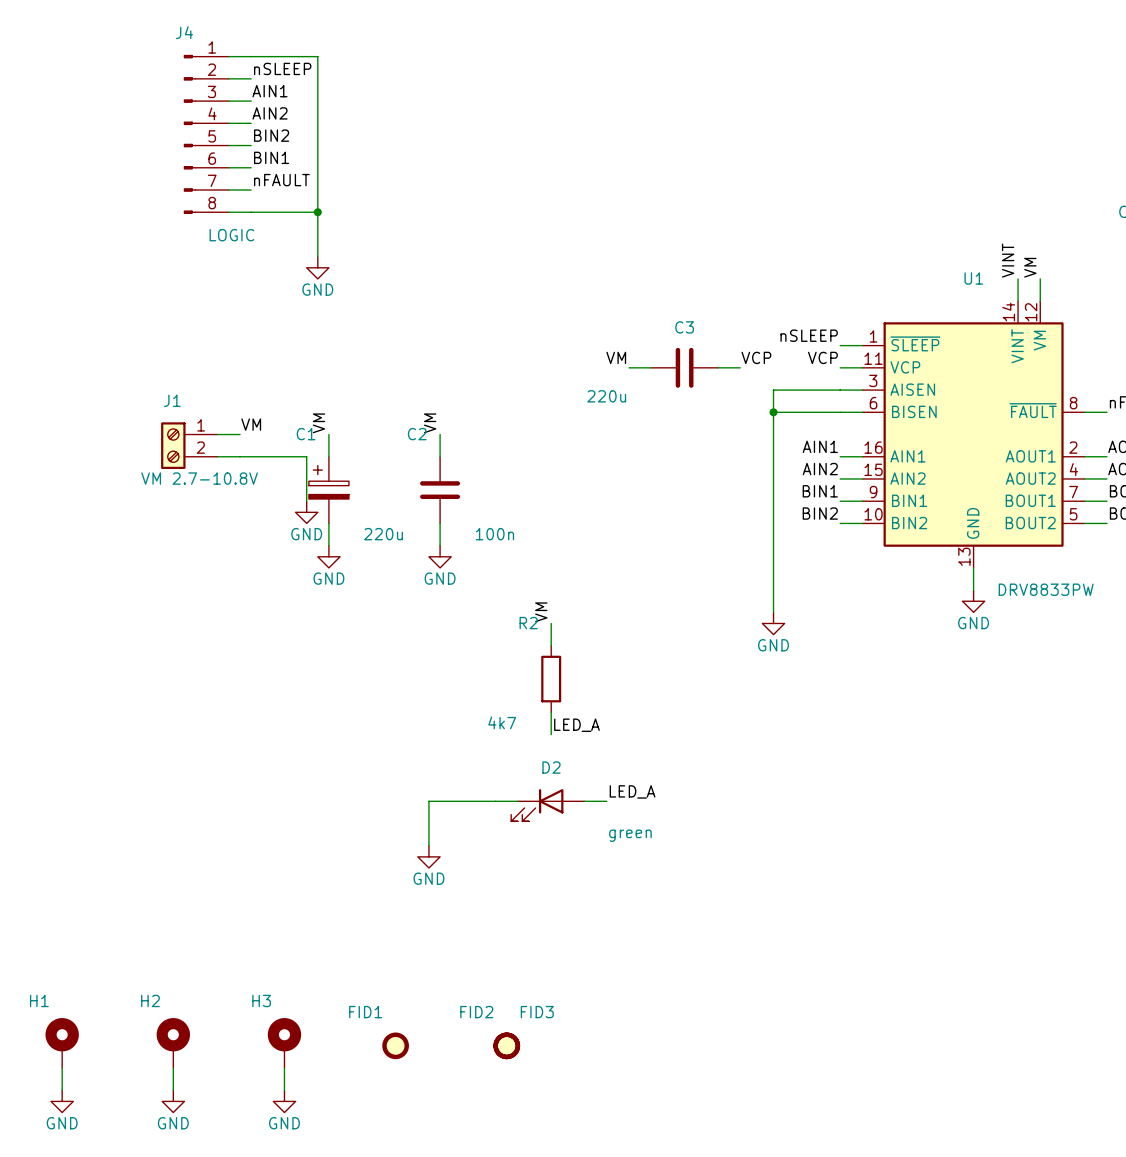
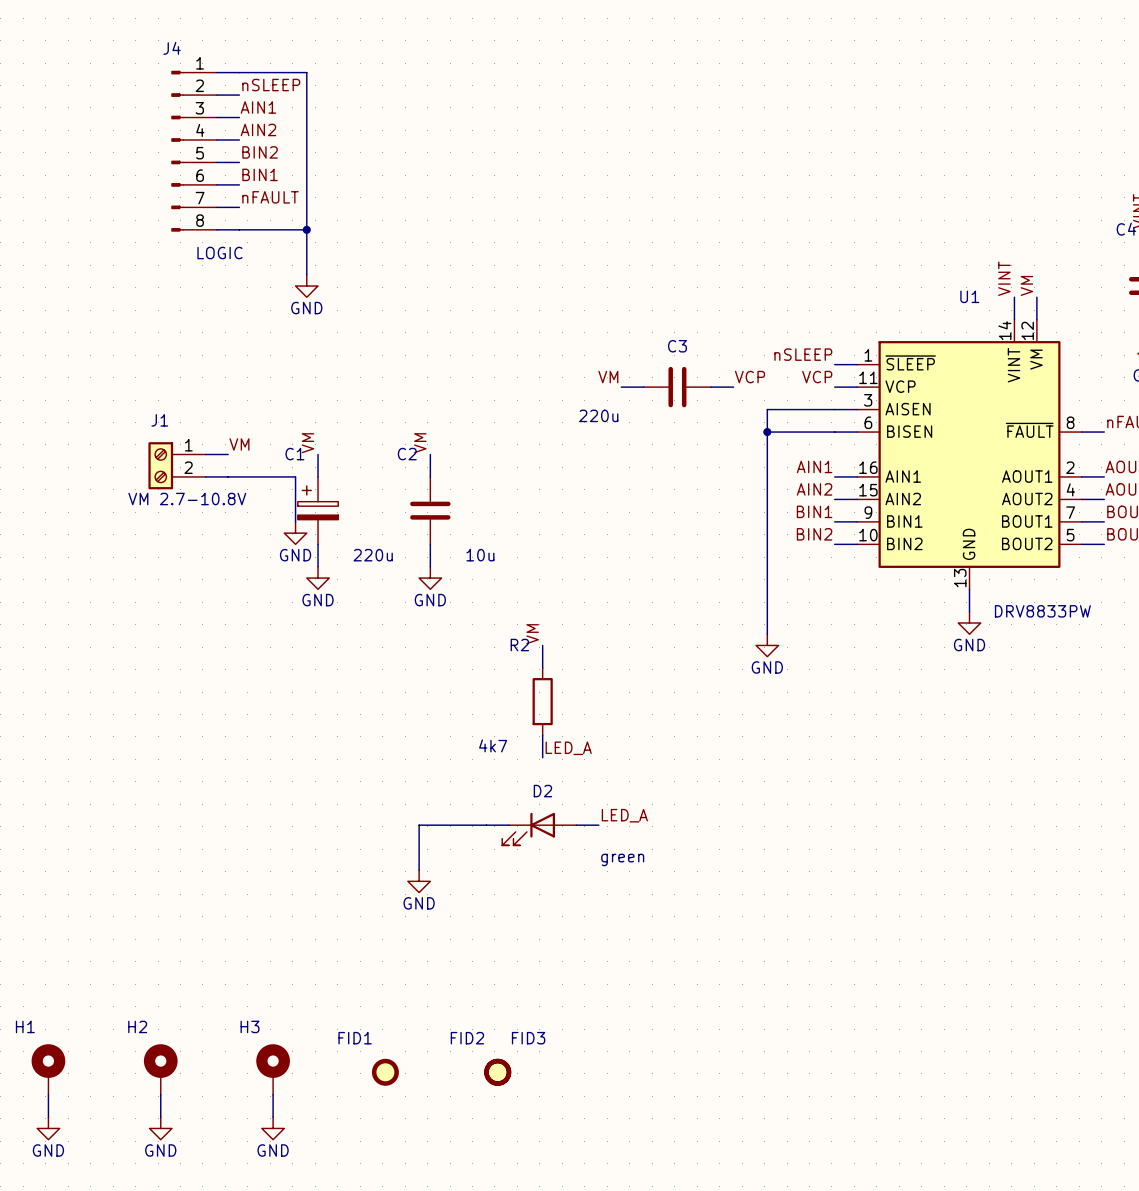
C2 value: 100n (494, 534) -> 10u (480, 555)

